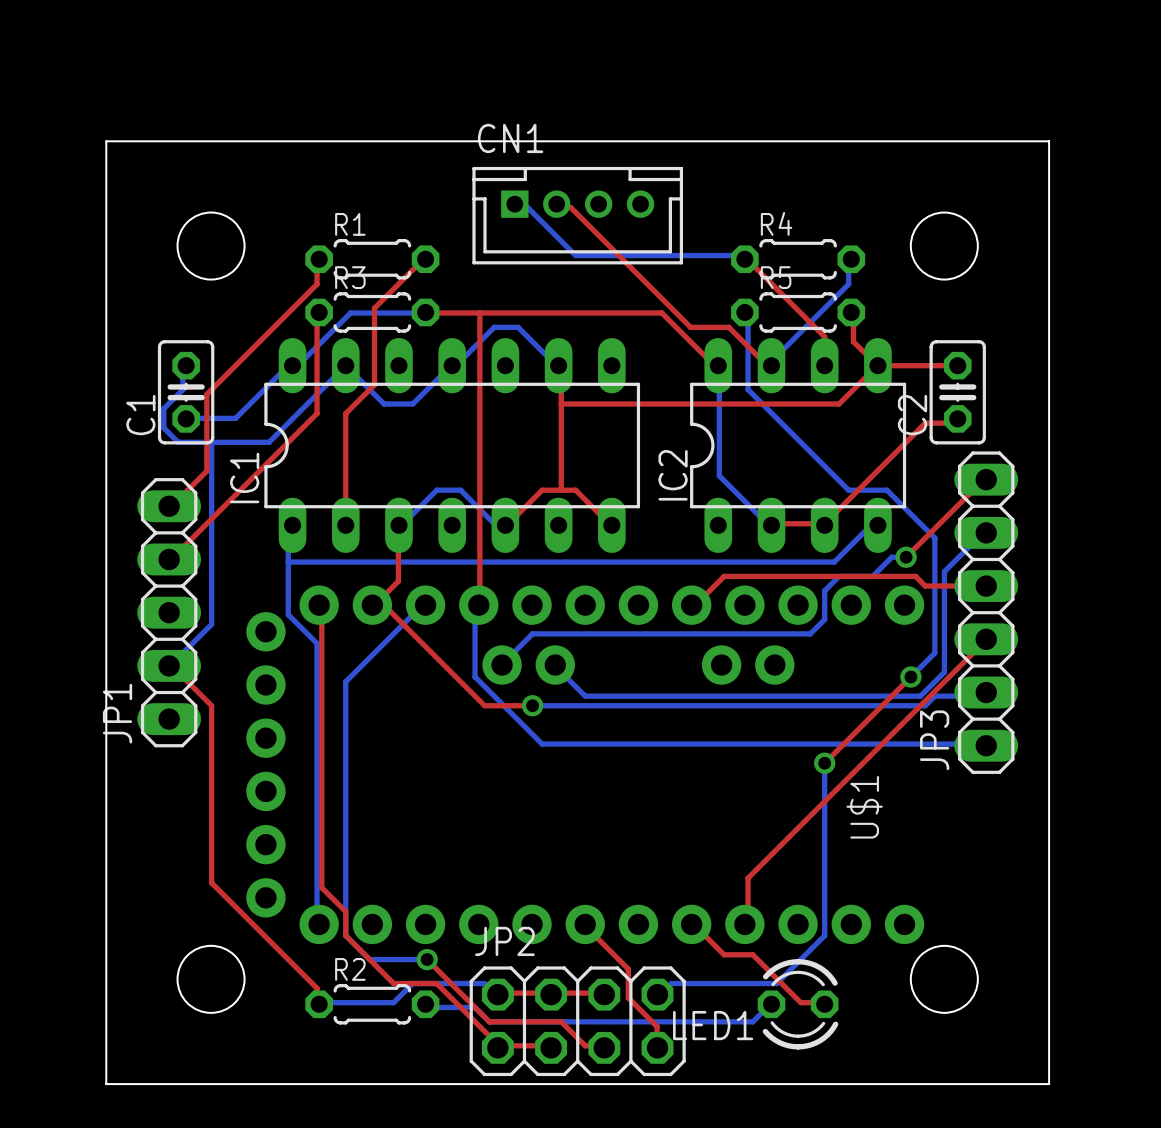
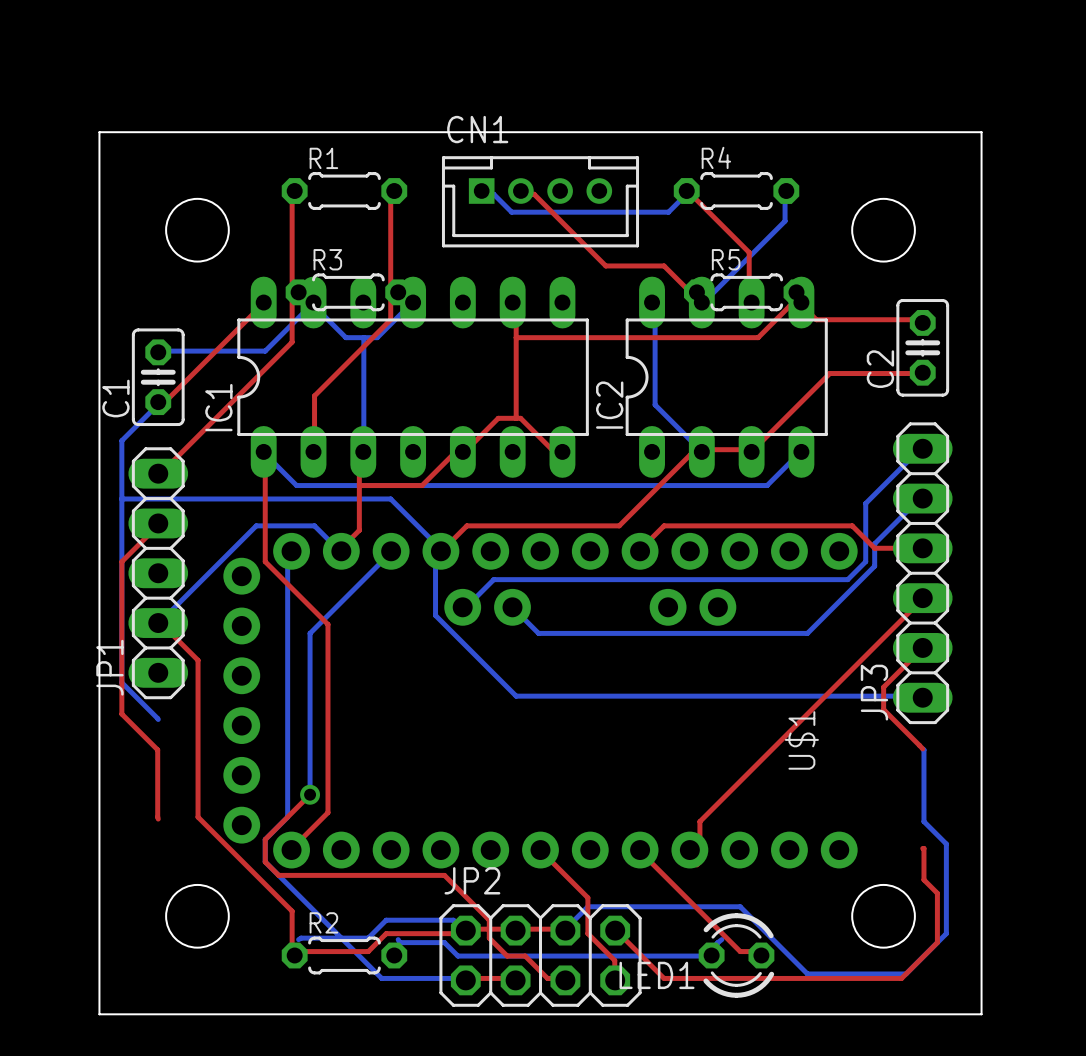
top track: none -> (686, 191) (749, 252) (749, 301) (751, 302)
bottom track: none -> (786, 191) (785, 221) (701, 302)
bottom track: (546, 226) (575, 255) (743, 255) (744, 259) -> (511, 212) (668, 212) (686, 194) (686, 191)
top track: (319, 259) (317, 260) (317, 284) (206, 394) (206, 471) -> (294, 191) (292, 194) (292, 342) (193, 440)
R1 position: (372, 259) -> (344, 191)
top track: (425, 259) (374, 308) (374, 384) -> (394, 191) (390, 194) (390, 319) (350, 360)
top track: (744, 259) (824, 336) (824, 365) -> none
R4 position: (798, 259) -> (736, 191)
bottom track: (851, 259) (848, 260) (848, 284) (767, 365) (771, 365) -> none
top track: (647, 284) (690, 327) (728, 327) (767, 365) (771, 365) -> (605, 265) (664, 265) (701, 302)
top track: (319, 312) (317, 313) (317, 413) (169, 559) -> (158, 819) (157, 749) (121, 714) (121, 561) (158, 523)
top track: (425, 312) (661, 313) (714, 365) (718, 365) -> none
bottom track: (425, 312) (350, 313) (297, 365) (288, 365) (235, 418) (186, 418) -> none
bottom track: (744, 312) (748, 313) (748, 389) (848, 490) (886, 490) (934, 538) (934, 581) -> (883, 534) (874, 543)
top track: (851, 312) (853, 313) (853, 341) (877, 365) -> none
top track: (479, 313) (478, 605) -> none
top track: none -> (263, 302) (162, 404) (158, 402)
bottom track: none -> (413, 302) (377, 337) (345, 337) (314, 306) (313, 302) (265, 351) (158, 352)
top track: none -> (512, 302) (516, 306) (516, 418)
bottom track: none -> (652, 302) (655, 306) (655, 404) (701, 451)
top track: none -> (922, 322) (919, 319) (816, 319) (801, 302) (798, 306) (789, 306) (758, 337) (516, 337)
bottom track: none -> (363, 337) (363, 451)
bottom track: (186, 365) (182, 365) (182, 389) (163, 408) (163, 427) (178, 442) (269, 442) (345, 365) (384, 404) (412, 404) (451, 365) (455, 365) (494, 327) (518, 327) (558, 365) -> none
top track: (558, 365) (561, 365) (561, 490) -> none
bottom track: (718, 365) (719, 475) (767, 523) (771, 525) -> none
top track: (877, 365) (957, 365) -> none
top track: (877, 365) (839, 404) (561, 404) -> none
C1 position: (186, 392) -> (158, 377)
C2 position: (957, 392) -> (922, 347)
top track: none -> (922, 372) (829, 373) (751, 451) (749, 449) (704, 449) (699, 454) (690, 454) (619, 525) (466, 525) (440, 551)
top track: (345, 413) (345, 525) -> (323, 386) (314, 395) (313, 451)
top track: (957, 418) (954, 423) (925, 423) (824, 523) -> none
bottom track: none -> (158, 402) (121, 440) (121, 682) (158, 719)
bottom track: (211, 442) (211, 624) -> (269, 525) (256, 525) (198, 584)
IC1 position: (452, 445) -> (413, 377)
IC2 position: (798, 445) -> (726, 377)
top track: (986, 479) (982, 480) (906, 557) -> none
bottom track: none -> (922, 448) (919, 449) (865, 503) (865, 561) (847, 579) (493, 579) (466, 606) (462, 607)
top track: none -> (263, 451) (265, 454) (265, 561) (327, 624) (327, 812) (291, 850)
bottom track: none -> (263, 451) (296, 485) (767, 485) (801, 451)
top track: none -> (363, 451) (359, 454) (359, 530) (341, 548) (341, 551)
top track: none -> (562, 451) (561, 449) (552, 449) (520, 418) (498, 418) (462, 454) (453, 454) (422, 485) (359, 485)
top track: (824, 523) (772, 523) (771, 525) -> none
bottom track: (292, 525) (288, 528) (288, 614) (317, 643) (317, 921) (319, 924) -> none
top track: (398, 525) (398, 581) (372, 605) (379, 600) (484, 705) (532, 705) -> none
bottom track: (398, 525) (403, 523) (436, 490) (460, 490) (494, 523) (505, 525) -> none
top track: (505, 525) (542, 490) (575, 490) (611, 525) -> none
bottom track: (877, 525) (877, 528) (867, 528) (834, 562) (336, 562) -> (341, 551) (314, 525)
bottom track: (906, 557) (891, 557) (872, 576) (839, 576) (824, 590) (824, 619) (810, 633) (532, 633) (502, 665) -> none
via: (906, 557) -> none
bottom track: (944, 571) (944, 672) (920, 696) (585, 696) (555, 665) -> none
top track: (934, 586) (925, 586) (915, 576) (724, 576) (695, 605) (691, 605) -> (874, 548) (852, 525) (664, 525) (640, 551)
bottom track: none -> (291, 551) (287, 552) (287, 817) (265, 839) (265, 861) (381, 978) (462, 978) (465, 980)
bottom track: none -> (391, 551) (310, 633) (310, 794)
top track: (319, 605) (321, 605) (321, 887) (345, 911) (345, 935) (393, 983) (436, 983) (499, 1045) -> none
bottom track: (425, 605) (422, 605) (345, 681) (345, 935) (369, 959) (427, 959) -> none
bottom track: (478, 605) (475, 605) (475, 677) (542, 744) (551, 744) -> (121, 498) (390, 498) (440, 548) (440, 551) (435, 557) (435, 615) (516, 696)
bottom track: (934, 605) (934, 653) (910, 677) -> (874, 566) (807, 633) (538, 633) (512, 607)
top track: (910, 677) (824, 763) -> none
via: (910, 677) -> none
top track: none -> (922, 647) (883, 687) (883, 709) (922, 748)
bottom track: (986, 692) (982, 696) (934, 696) (925, 705) (532, 705) -> none
via: (532, 705) -> none
bottom track: (824, 763) (824, 935) (776, 983) (671, 983) (661, 993) (657, 994) -> none
via: (824, 763) -> none
U$1 position: (585, 764) -> (540, 700)
bottom track: none -> (922, 748) (923, 821) (946, 844) (946, 933) (906, 973) (807, 973) (740, 906) (587, 906) (565, 930)
via: none -> (310, 794)
top track: (211, 873) (211, 882) (317, 988) (317, 1002) (319, 1004) -> (198, 817) (292, 911) (292, 951) (294, 955) (296, 951) (368, 951) (386, 933) (462, 933) (465, 930)
top track: none -> (922, 848) (923, 879) (937, 893) (937, 942) (901, 978) (664, 978) (615, 930)
top track: none -> (640, 850) (740, 951) (758, 951) (761, 955)
top track: (585, 924) (628, 969) -> (540, 850) (587, 897) (587, 906)
top track: (691, 924) (724, 954) (752, 954) (800, 1002) (824, 1002) (824, 1004) -> none
top track: (427, 959) (489, 1021) (542, 1021) -> (310, 794) (265, 839) (265, 861) (278, 875) (444, 875) (489, 920) (489, 938) (507, 956)
via: (427, 959) -> none
R2 position: (372, 1004) -> (344, 955)
LED1 position: (798, 1004) -> (736, 955)

